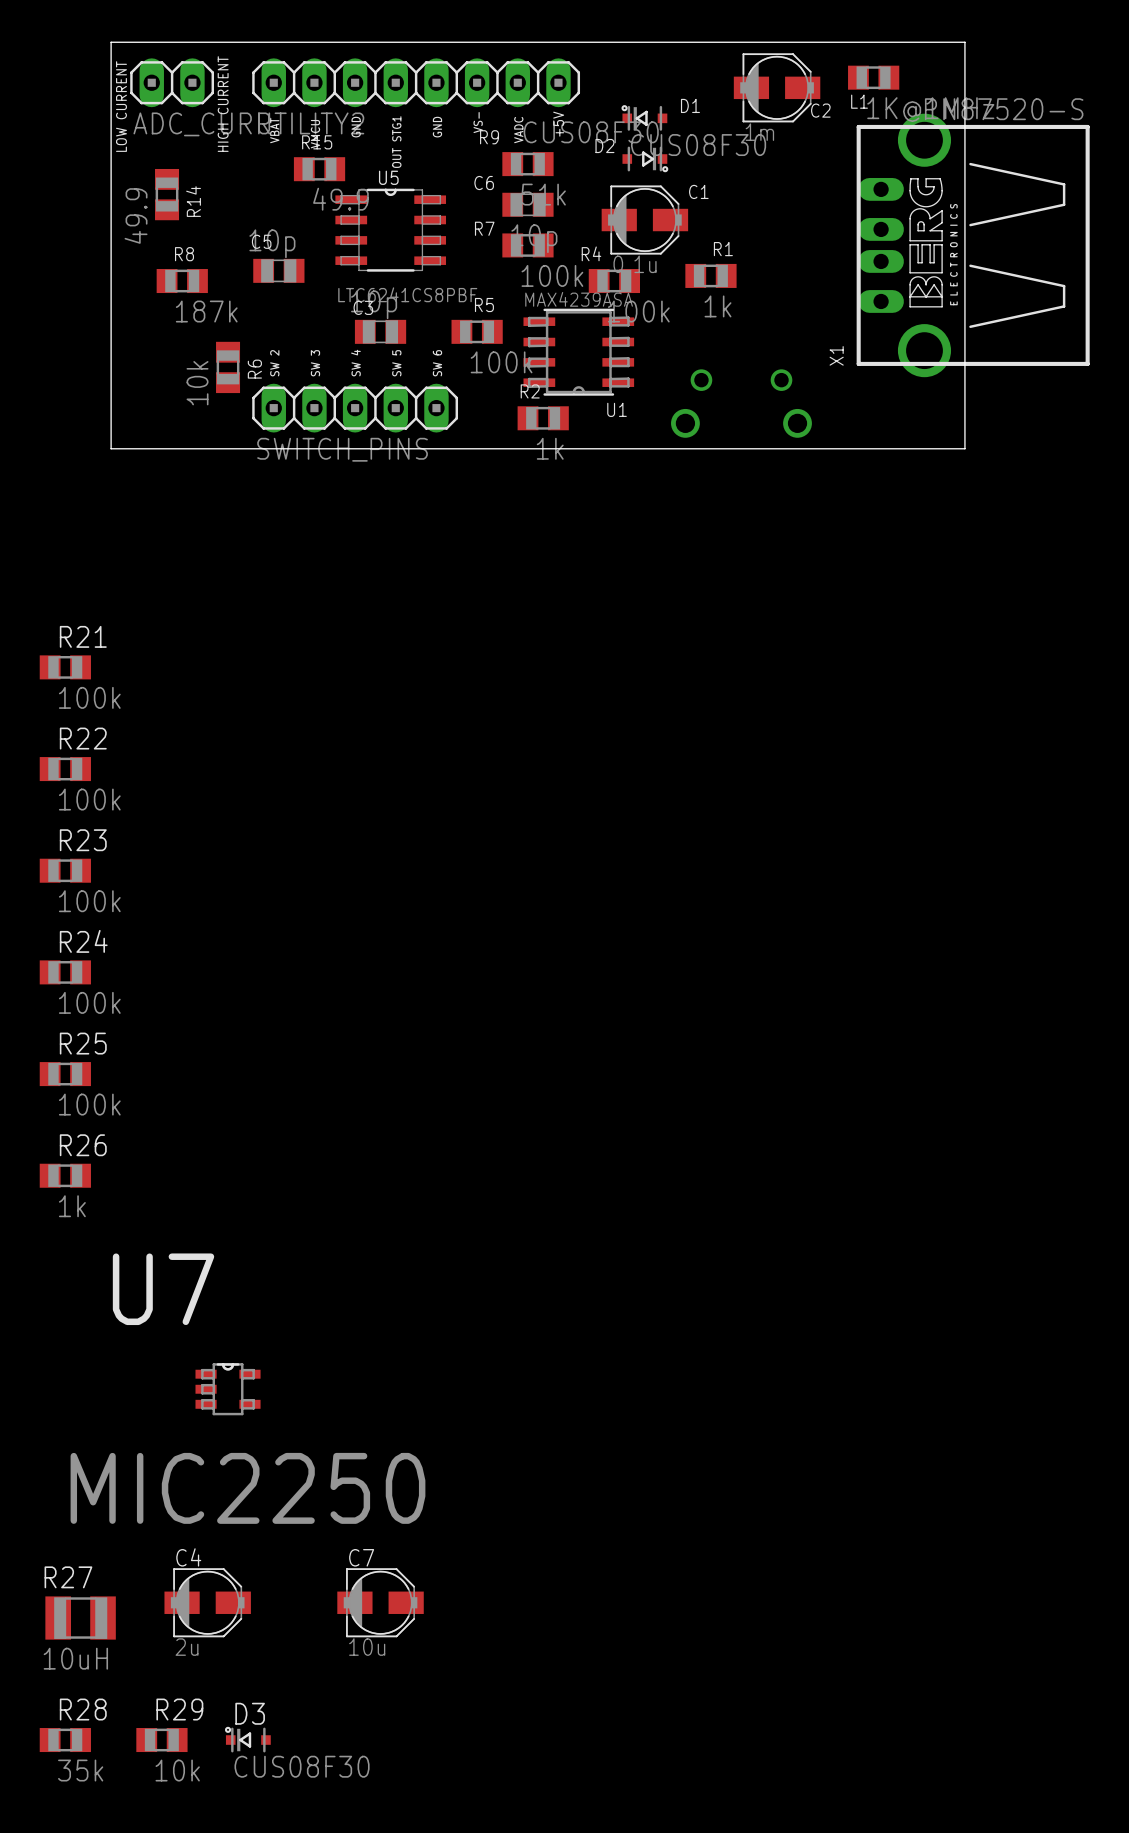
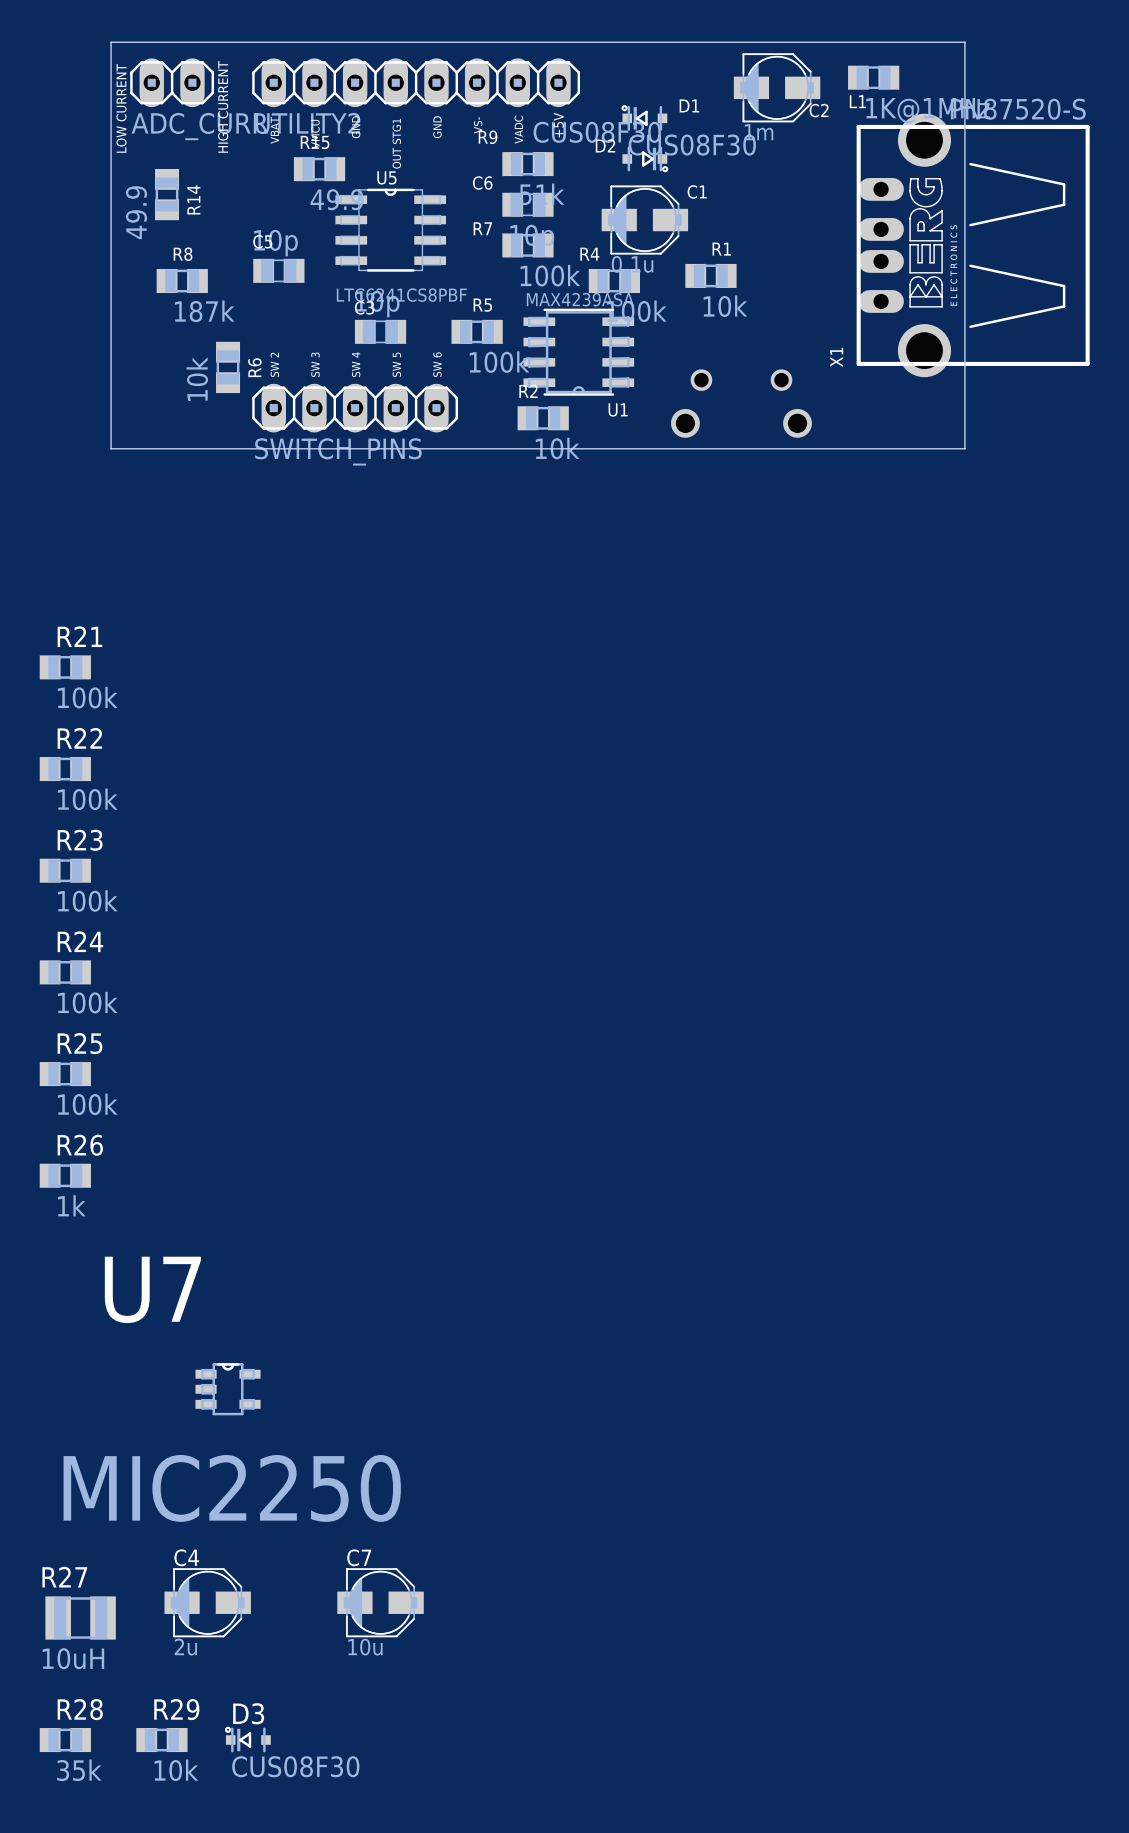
R1 value: 1k (718, 306) -> 10k (725, 306)
R2 value: 1k (550, 448) -> 10k (557, 448)

